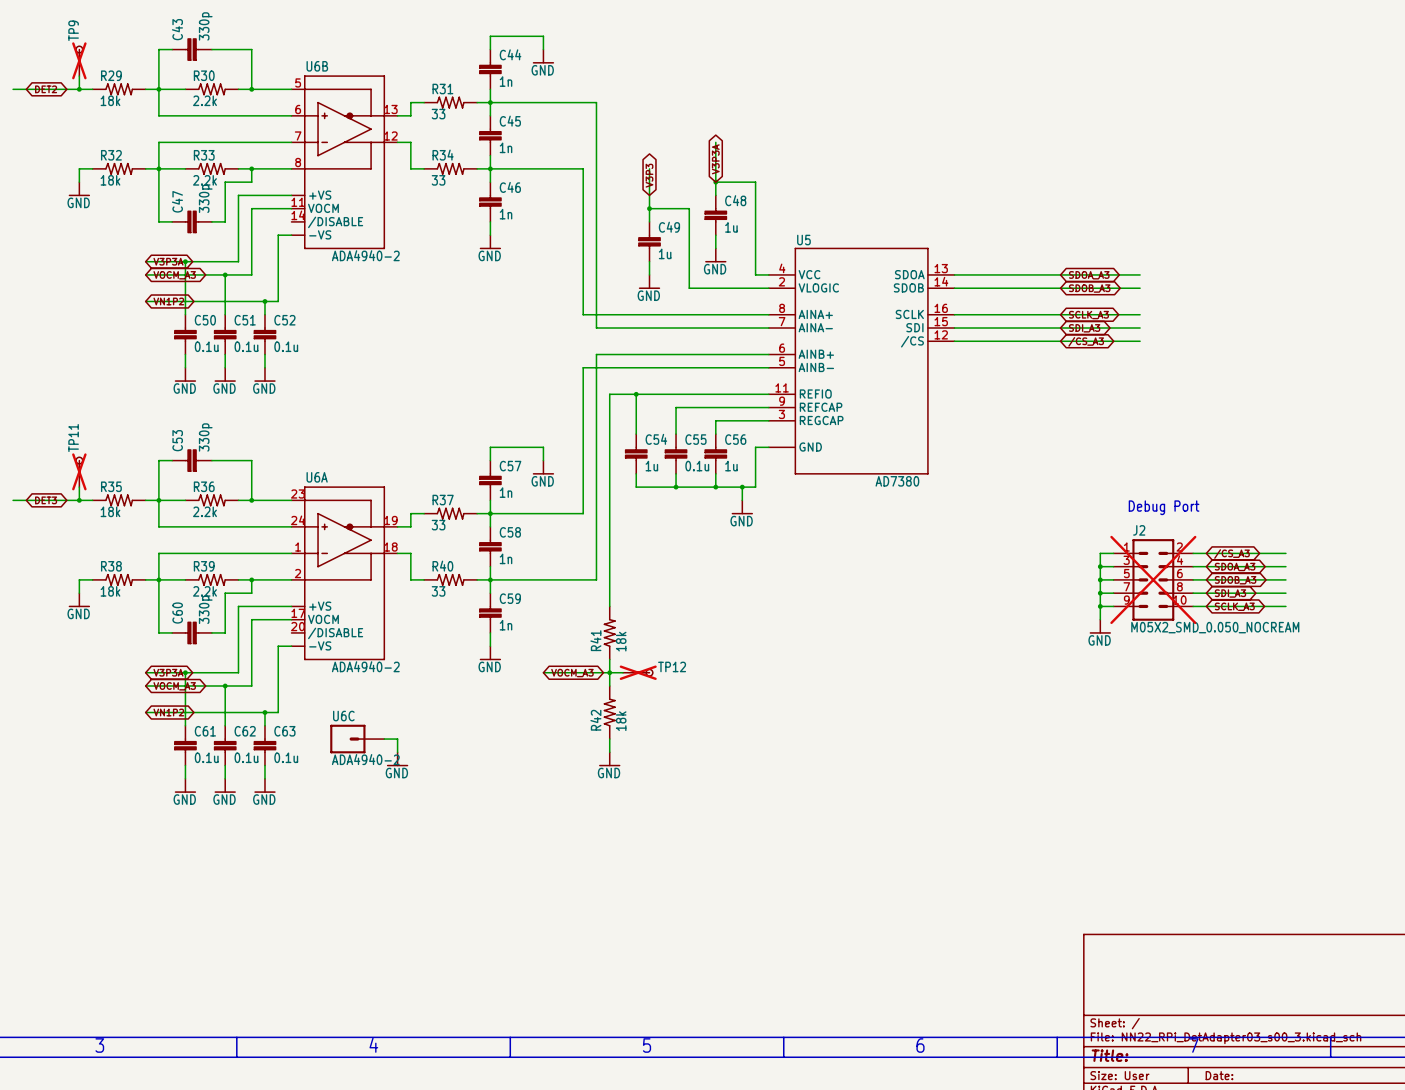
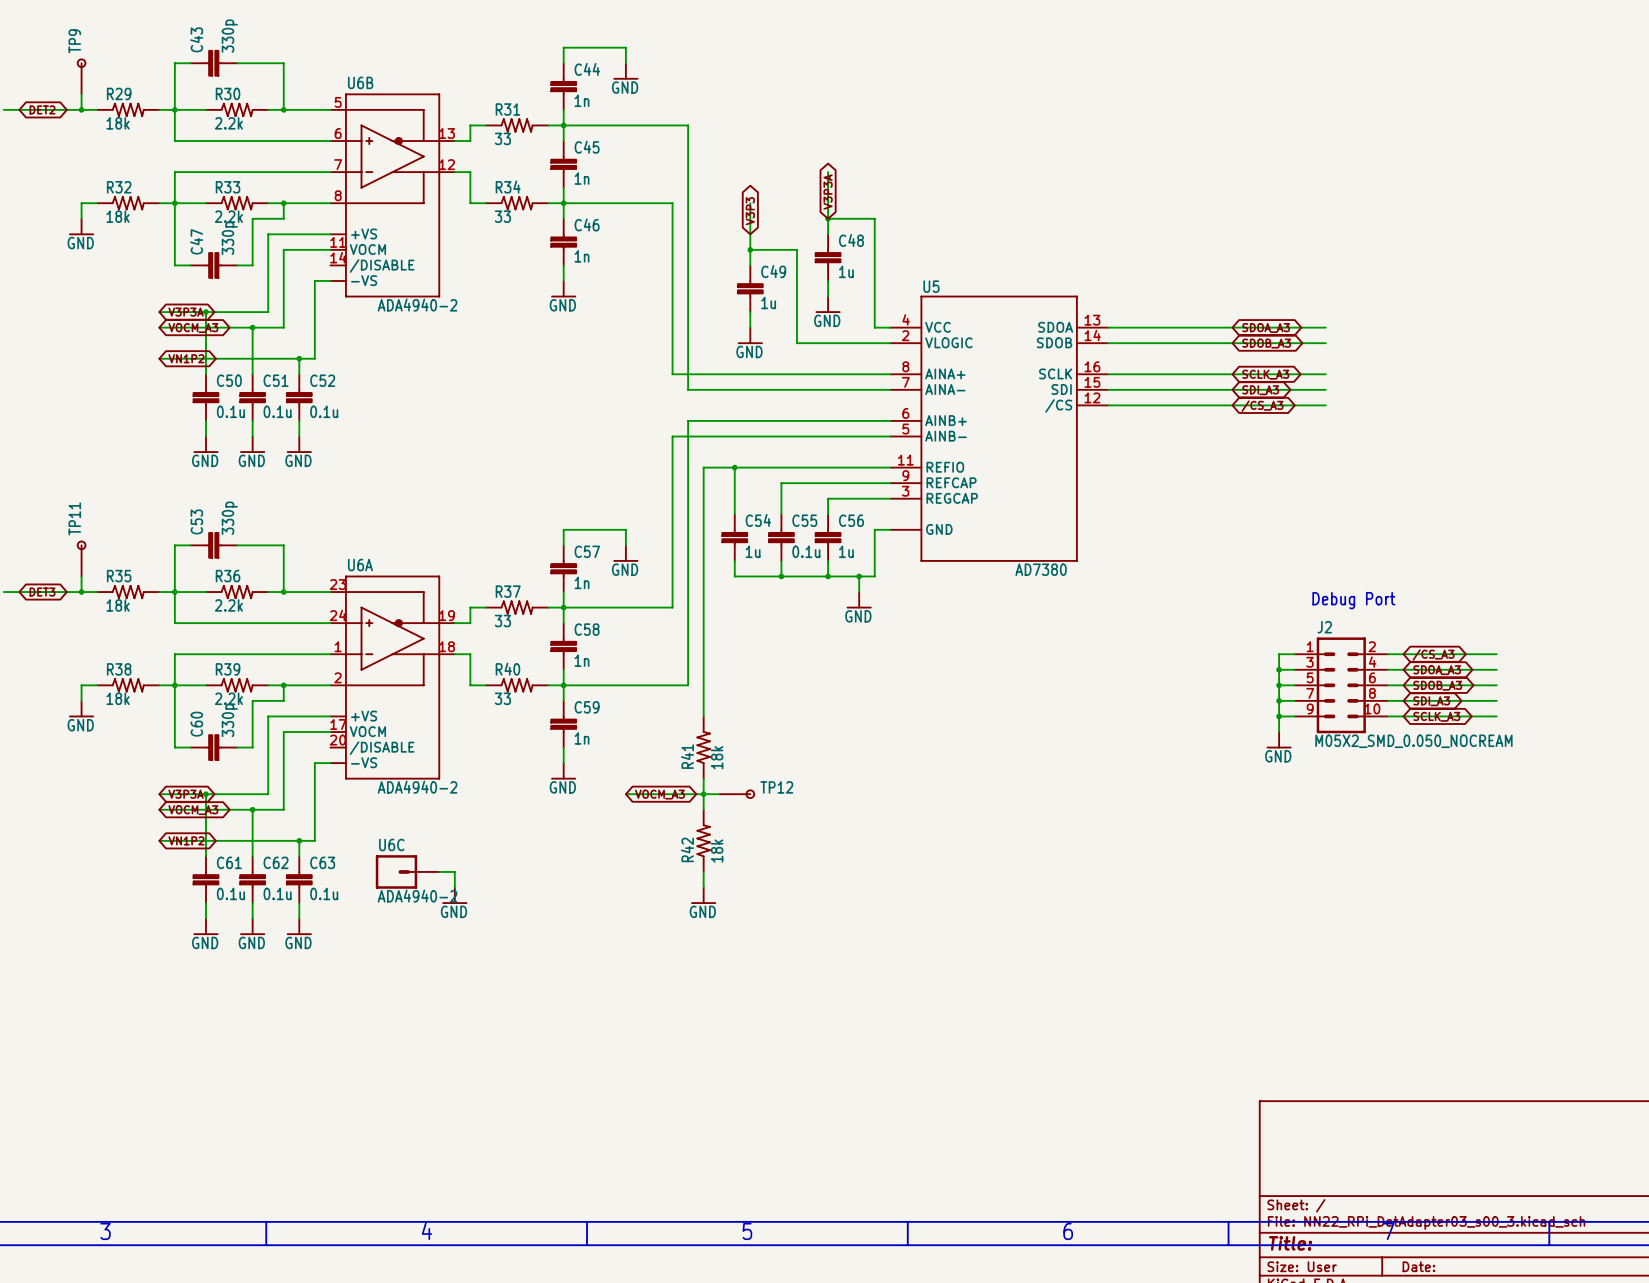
TP9 do-not-place cross: (79, 60) -> none
TP11 do-not-place cross: (79, 471) -> none
J2 do-not-place cross: (1153, 579) -> none
TP12 do-not-place cross: (638, 672) -> none

